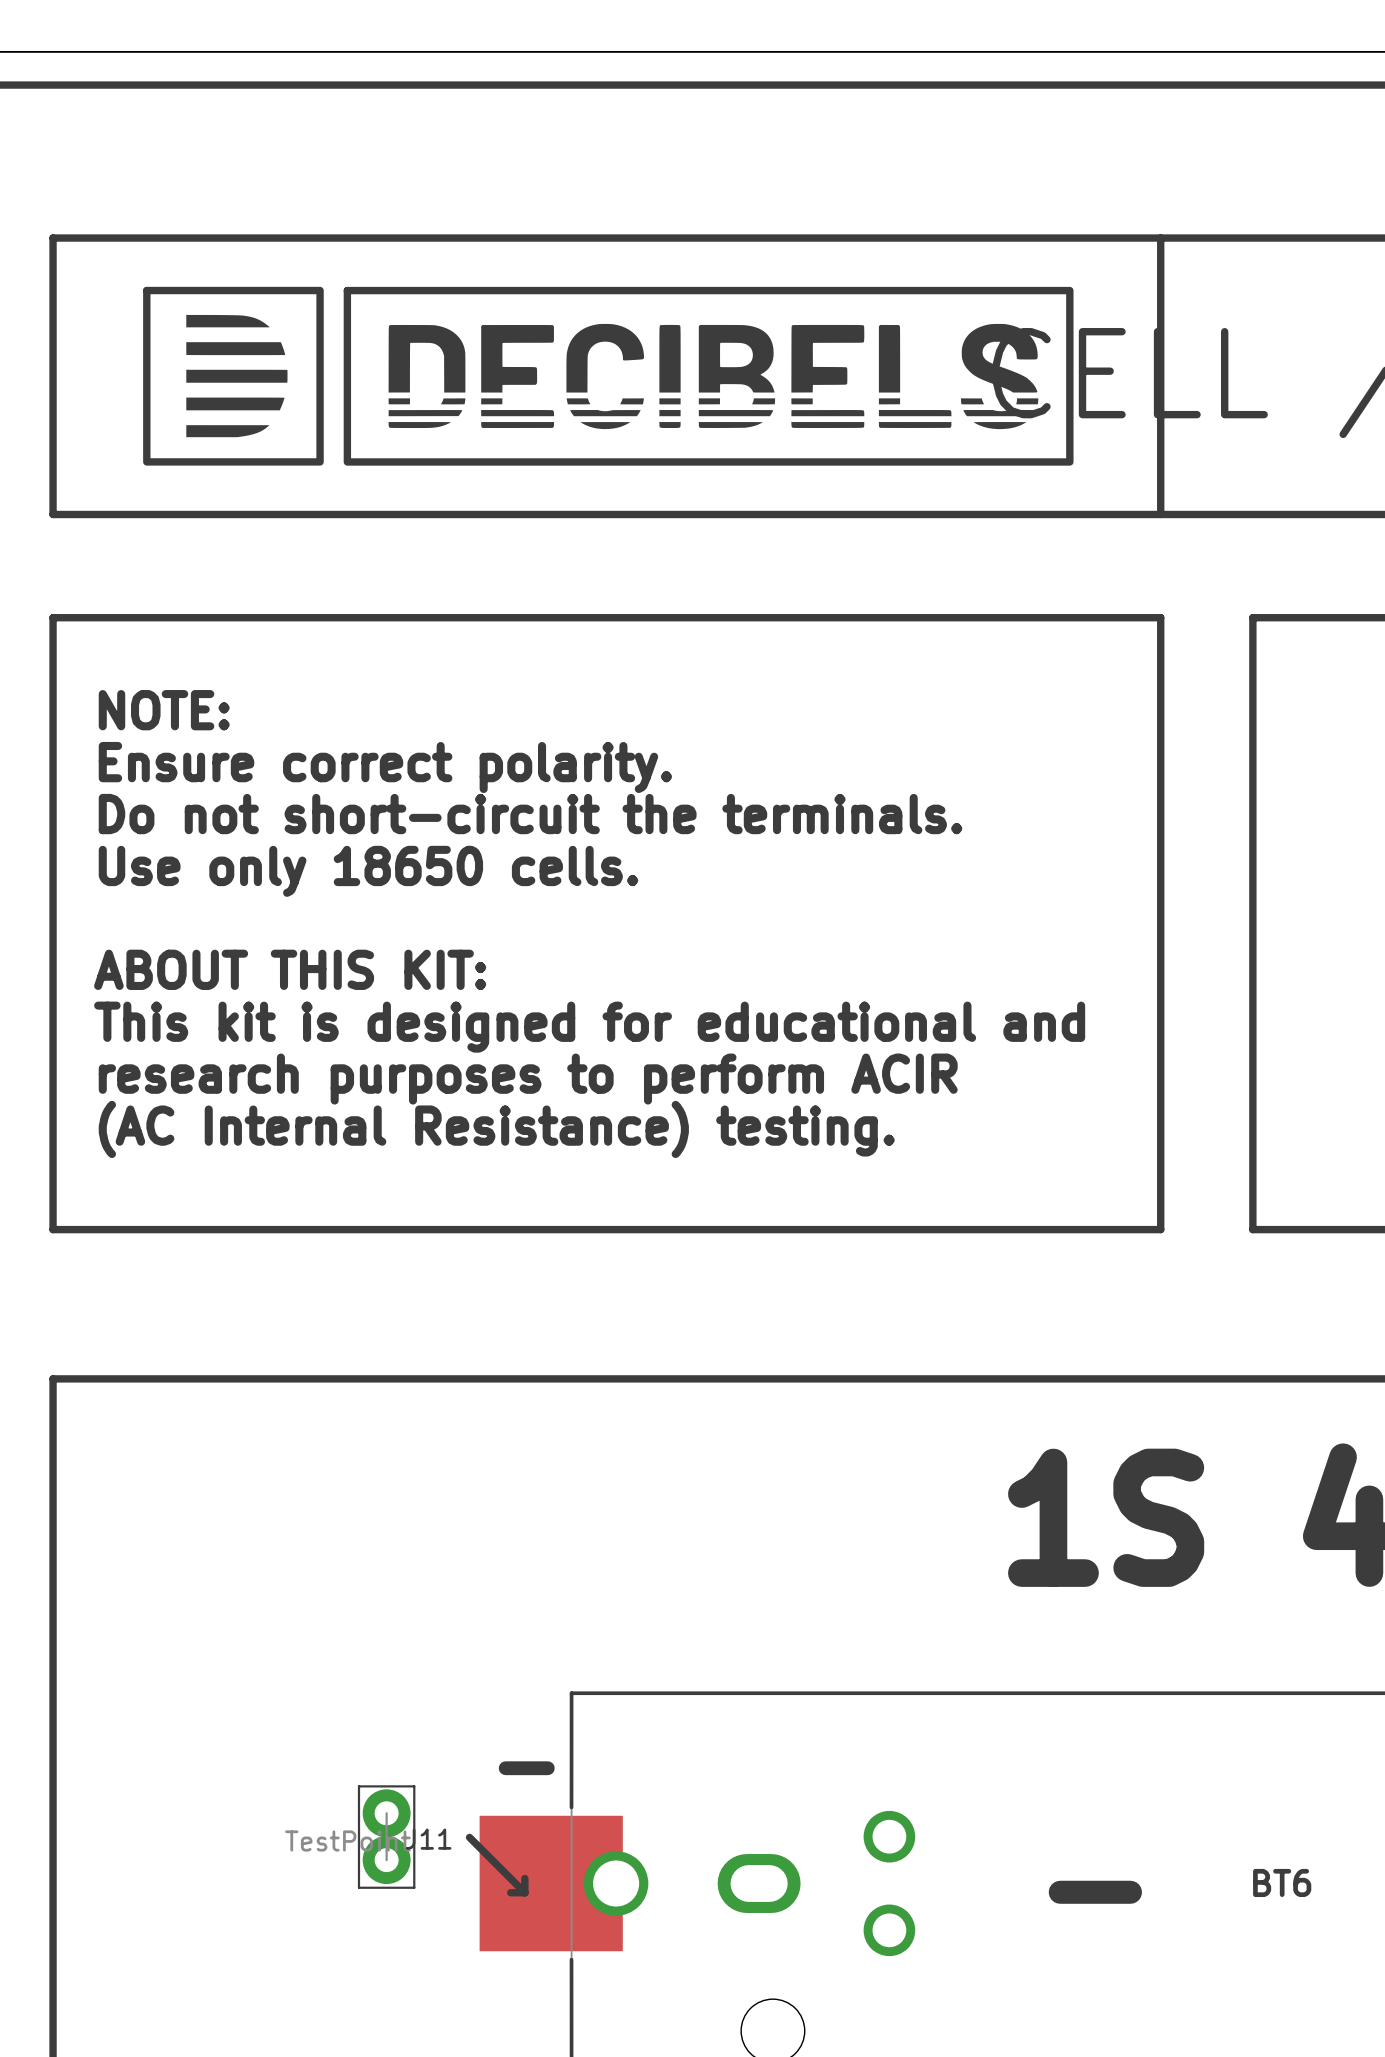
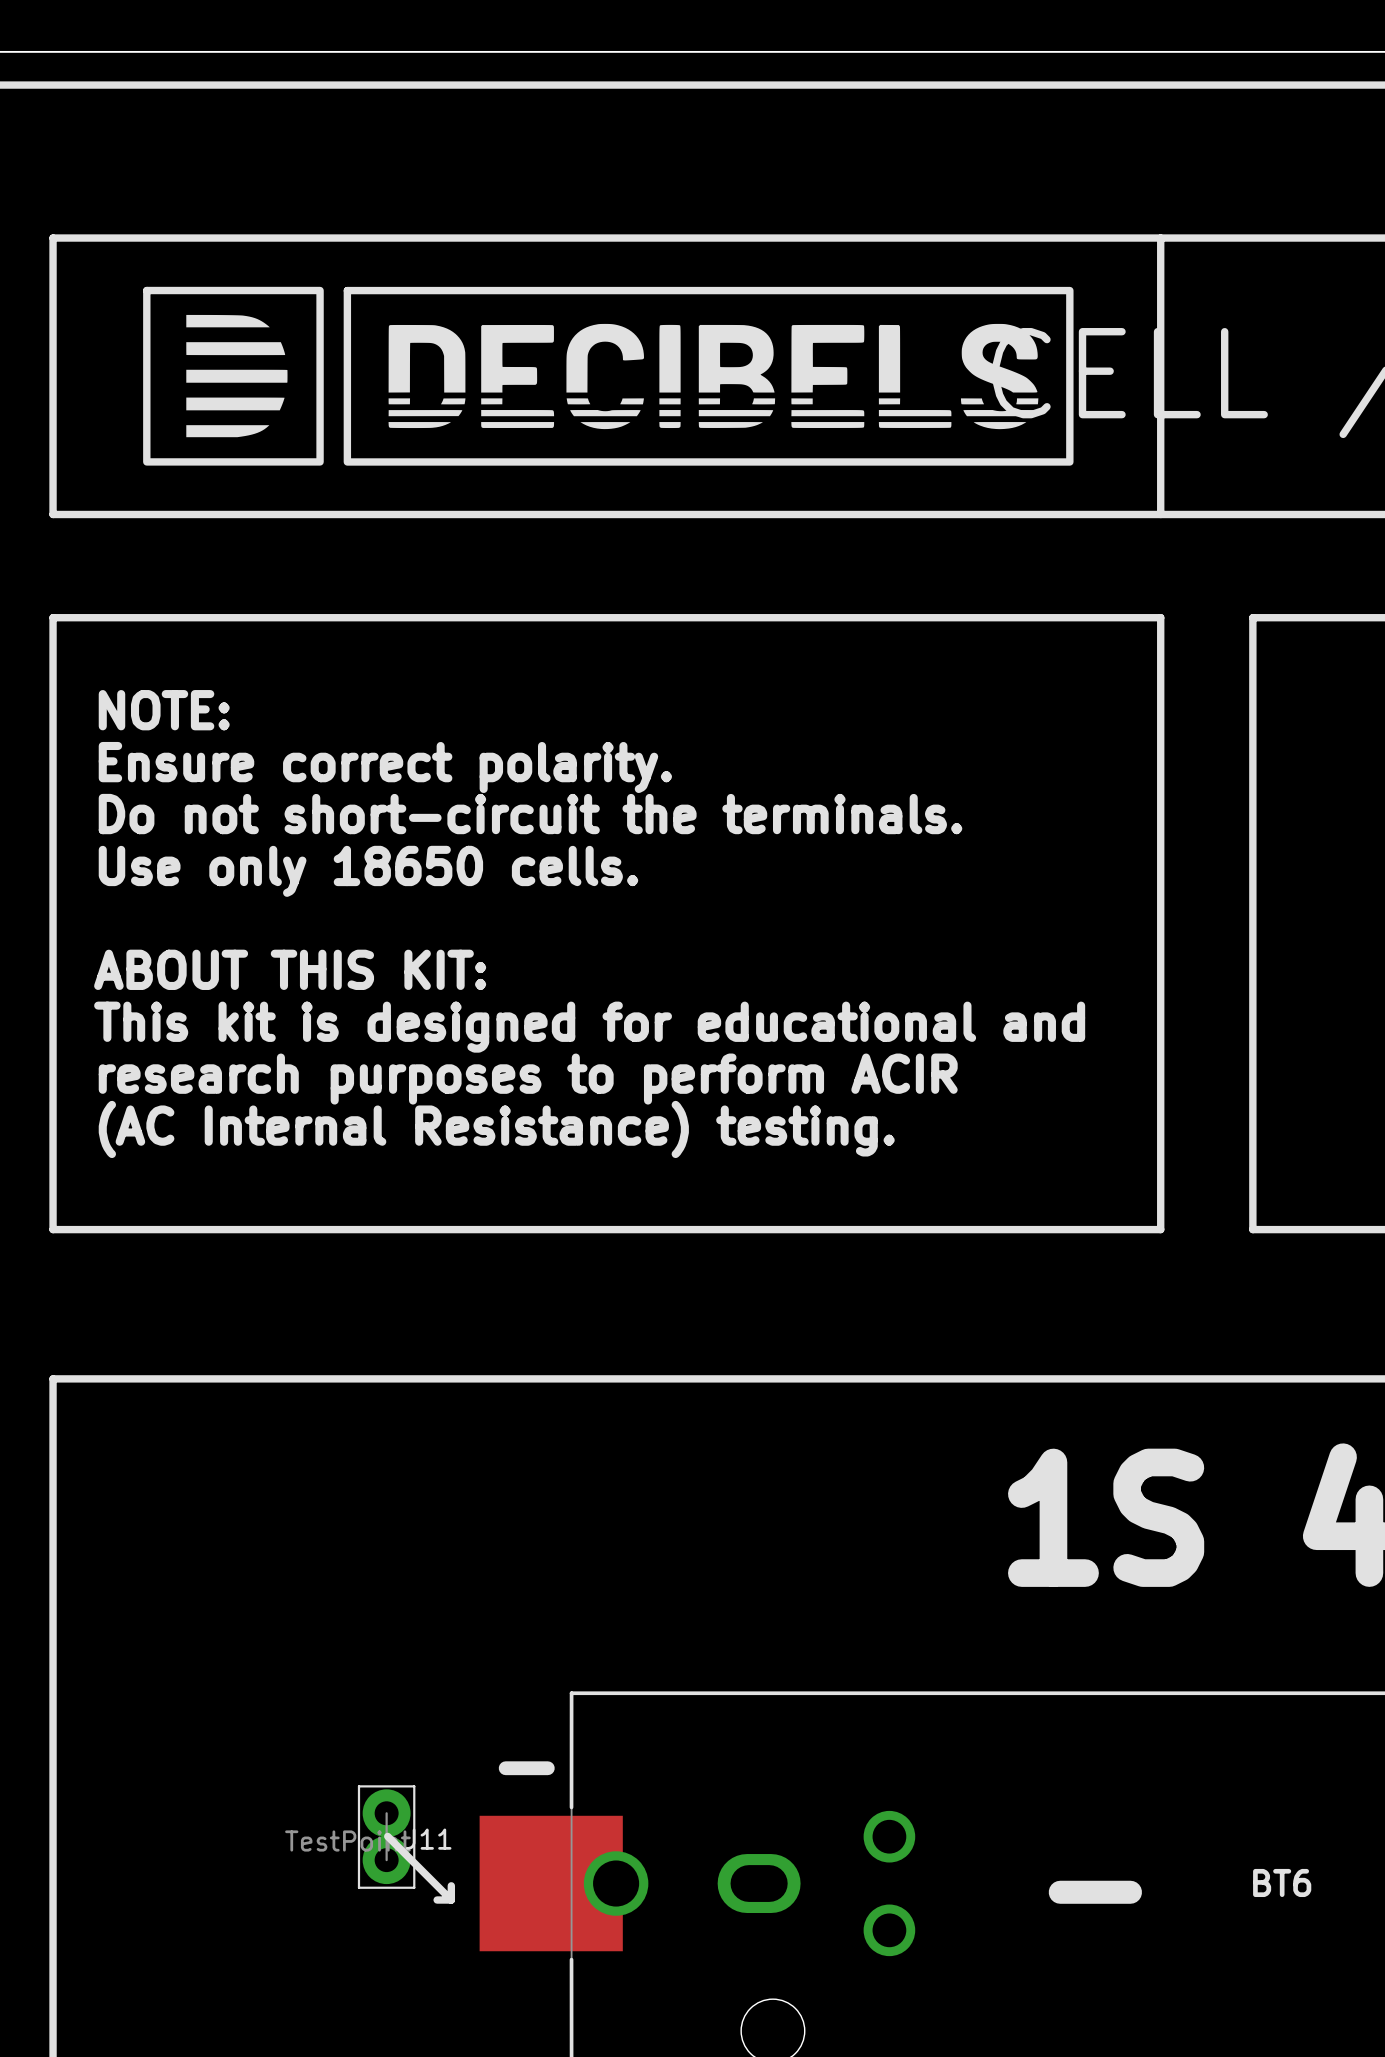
line: none -> (387, 1836) (451, 1900)
line: (469, 1837) (524, 1892) -> none
line: (524, 1878) (524, 1892) -> (451, 1885) (451, 1900)
line: (510, 1892) (524, 1892) -> (437, 1900) (451, 1900)

